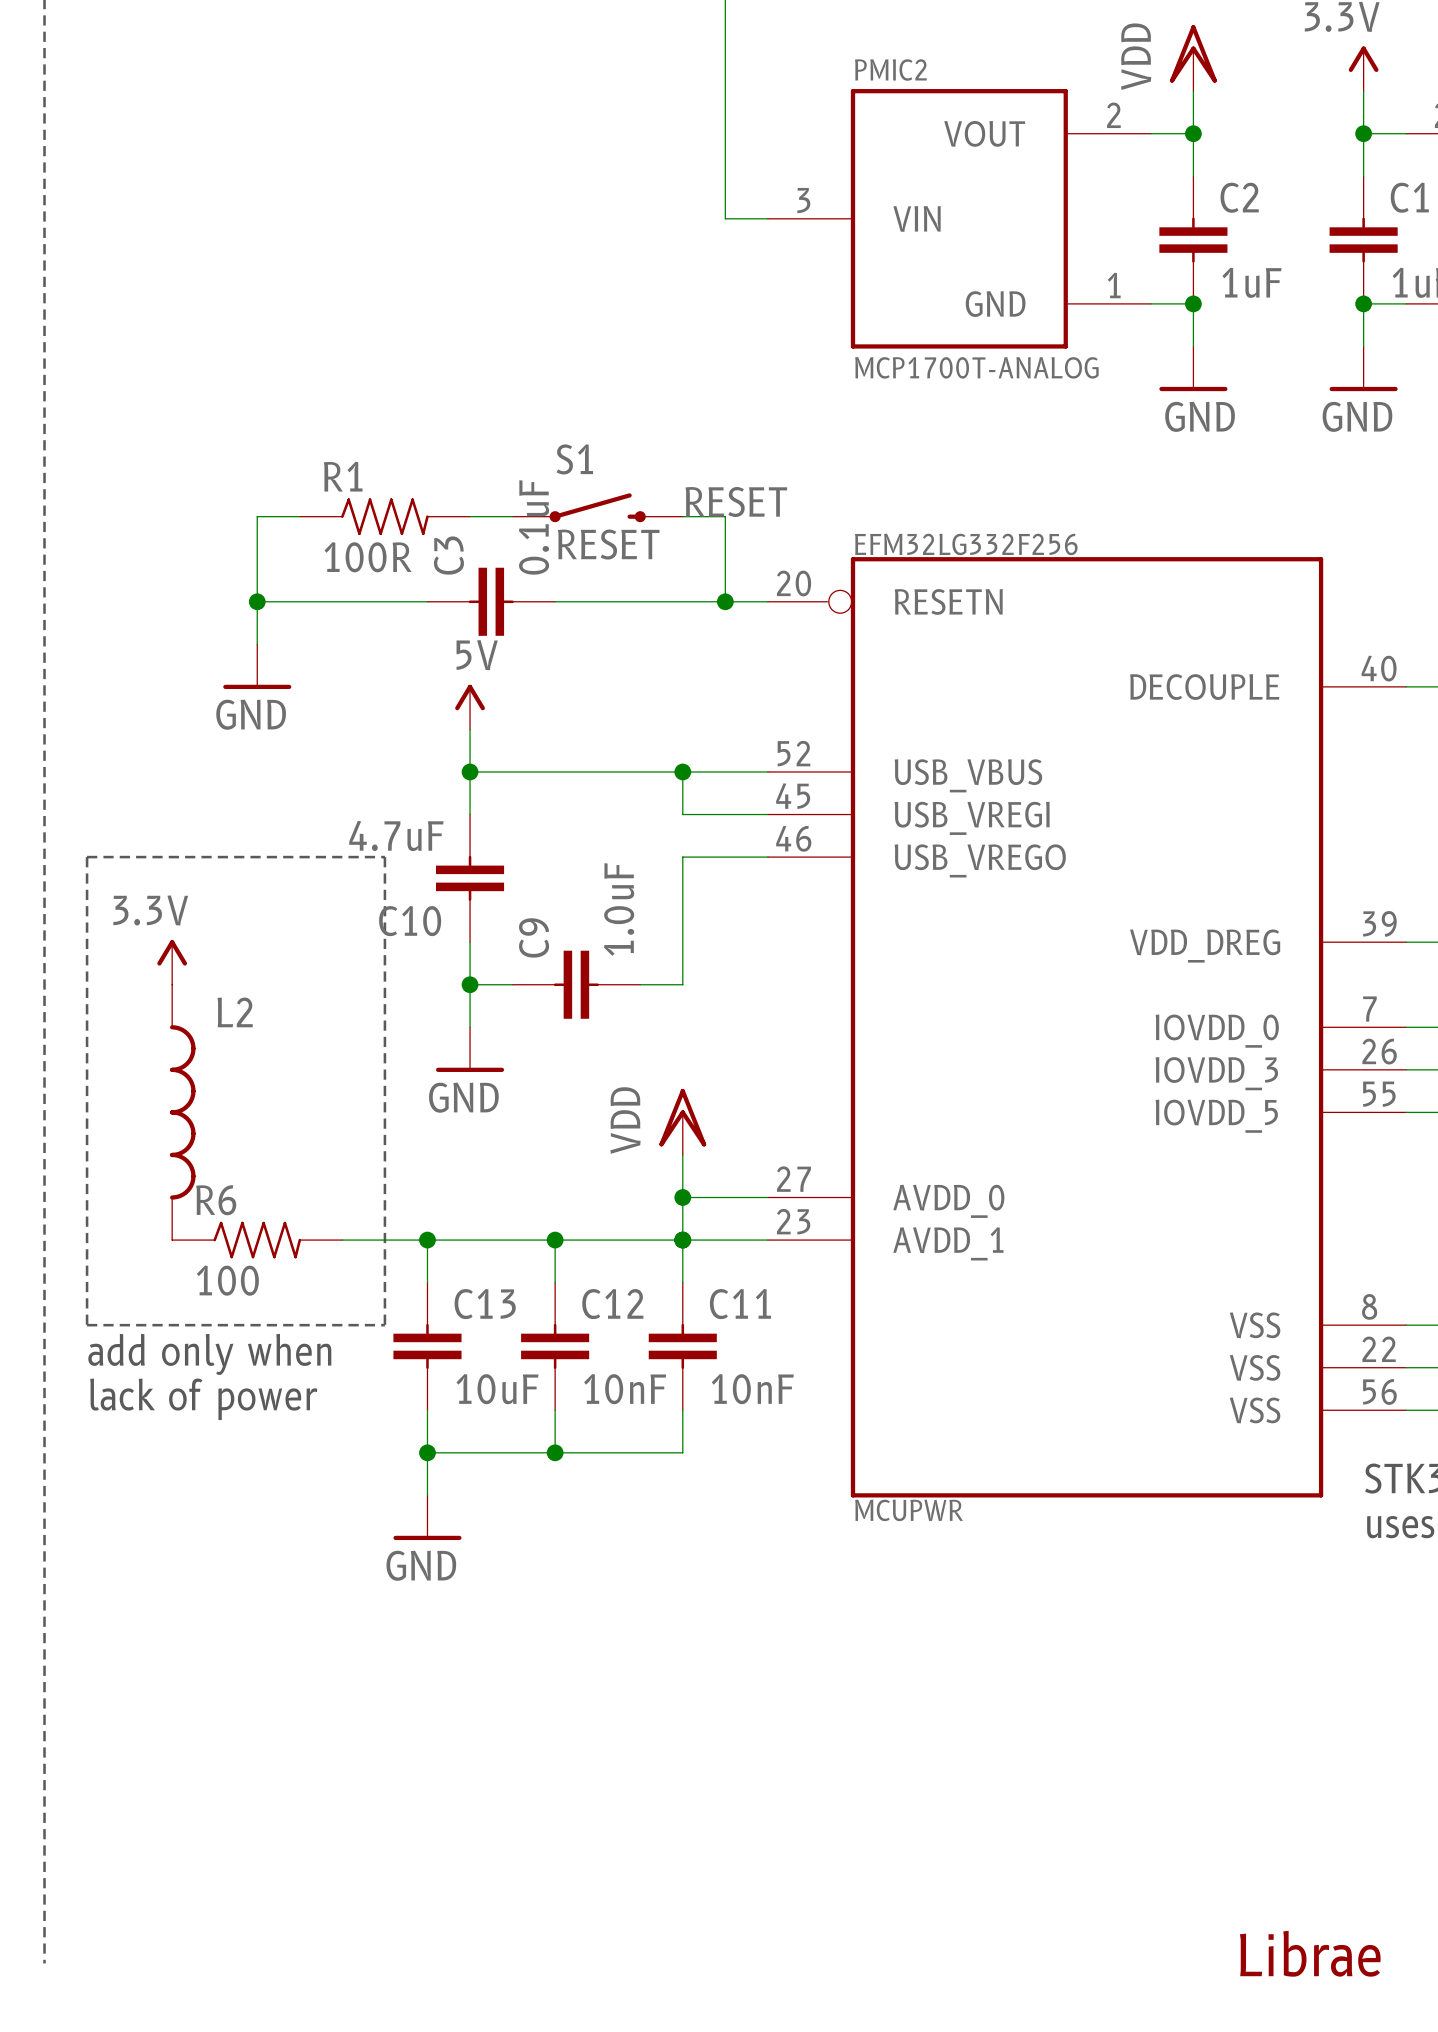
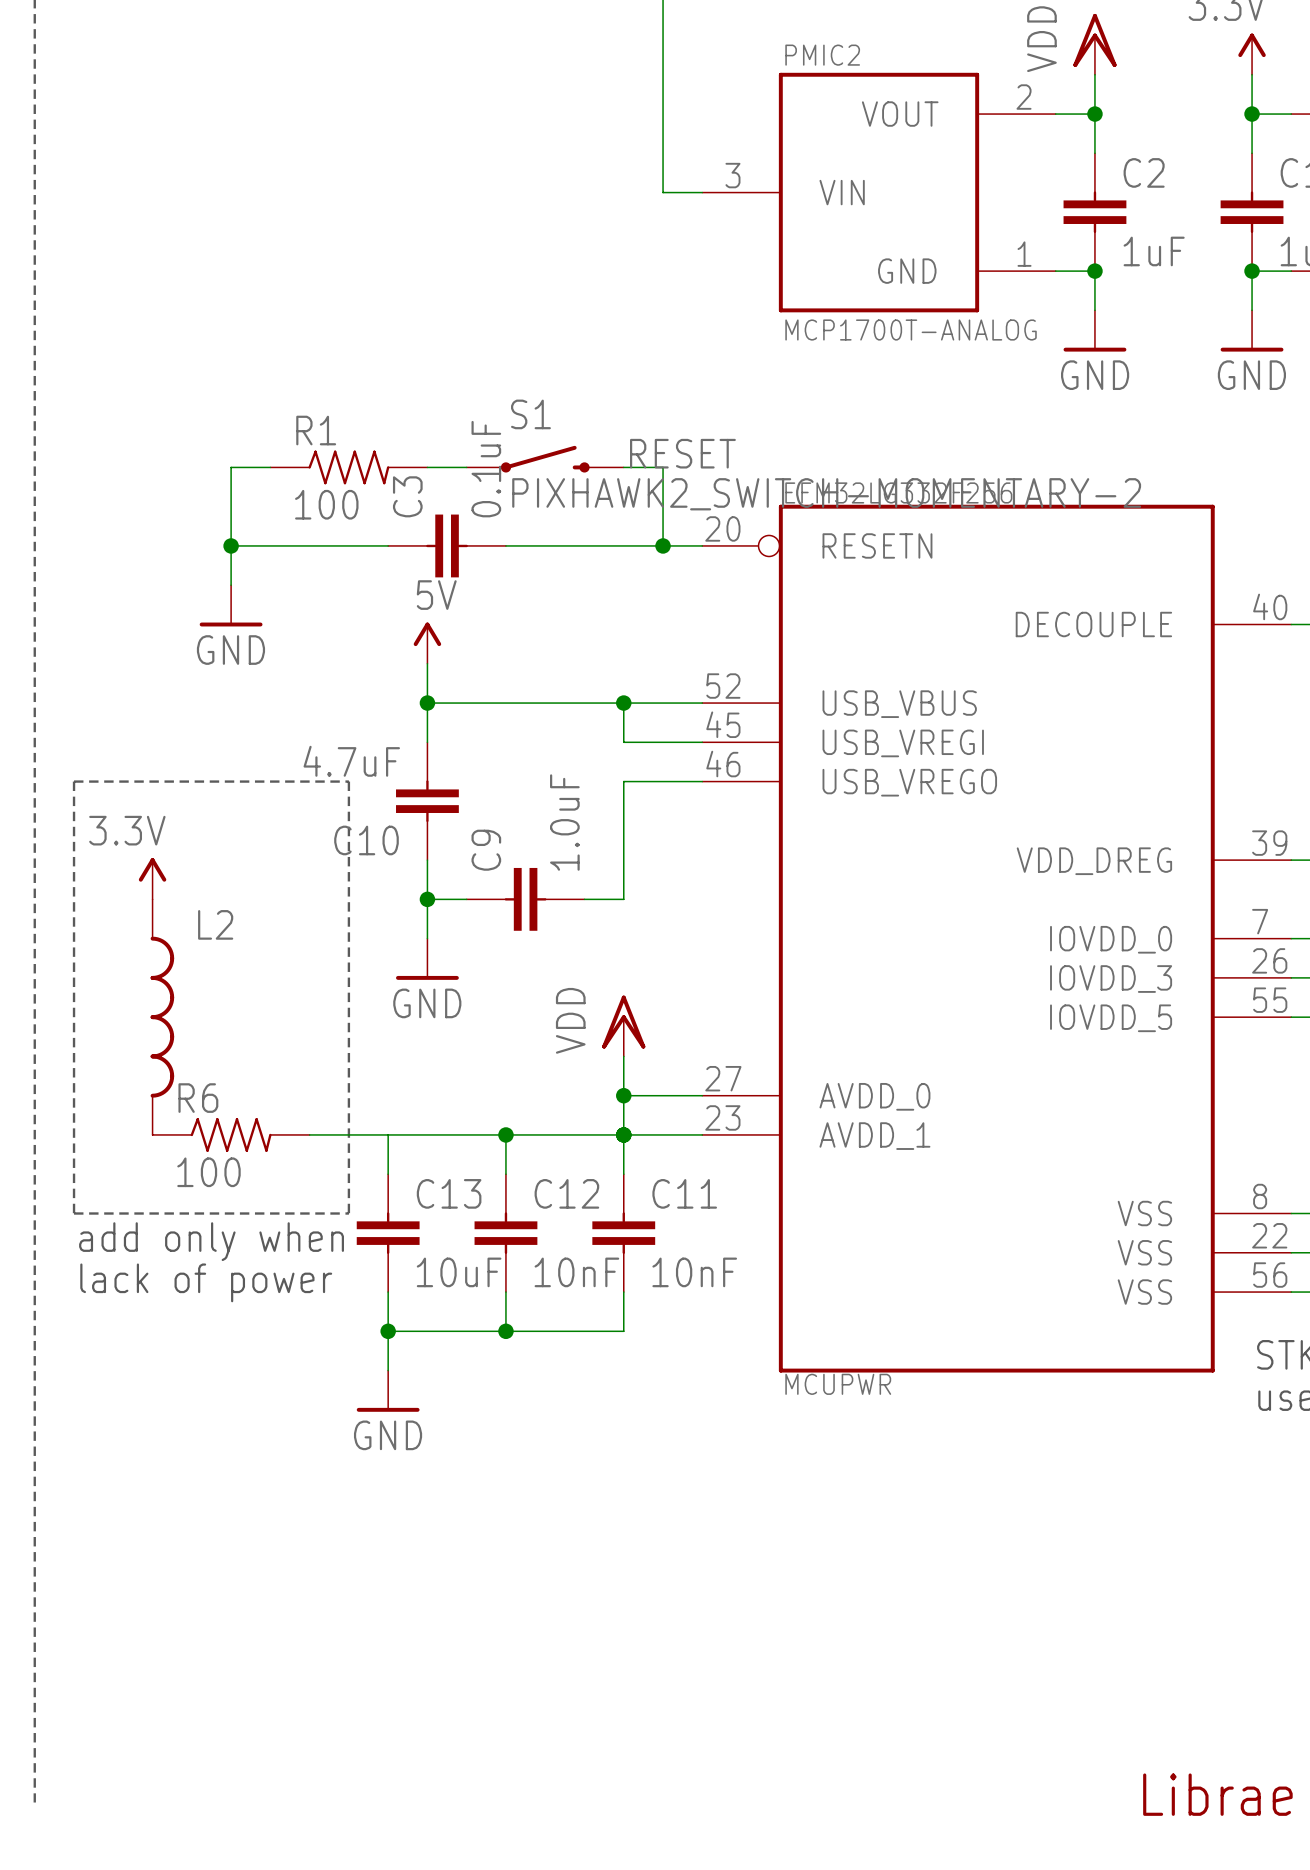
S1 value: RESET (608, 544) -> PIXHAWK2_SWITCH-MOMENTARY-2 (826, 494)
R1 value: 100R (368, 557) -> 100 (326, 504)
junction: (427, 1240) -> none

